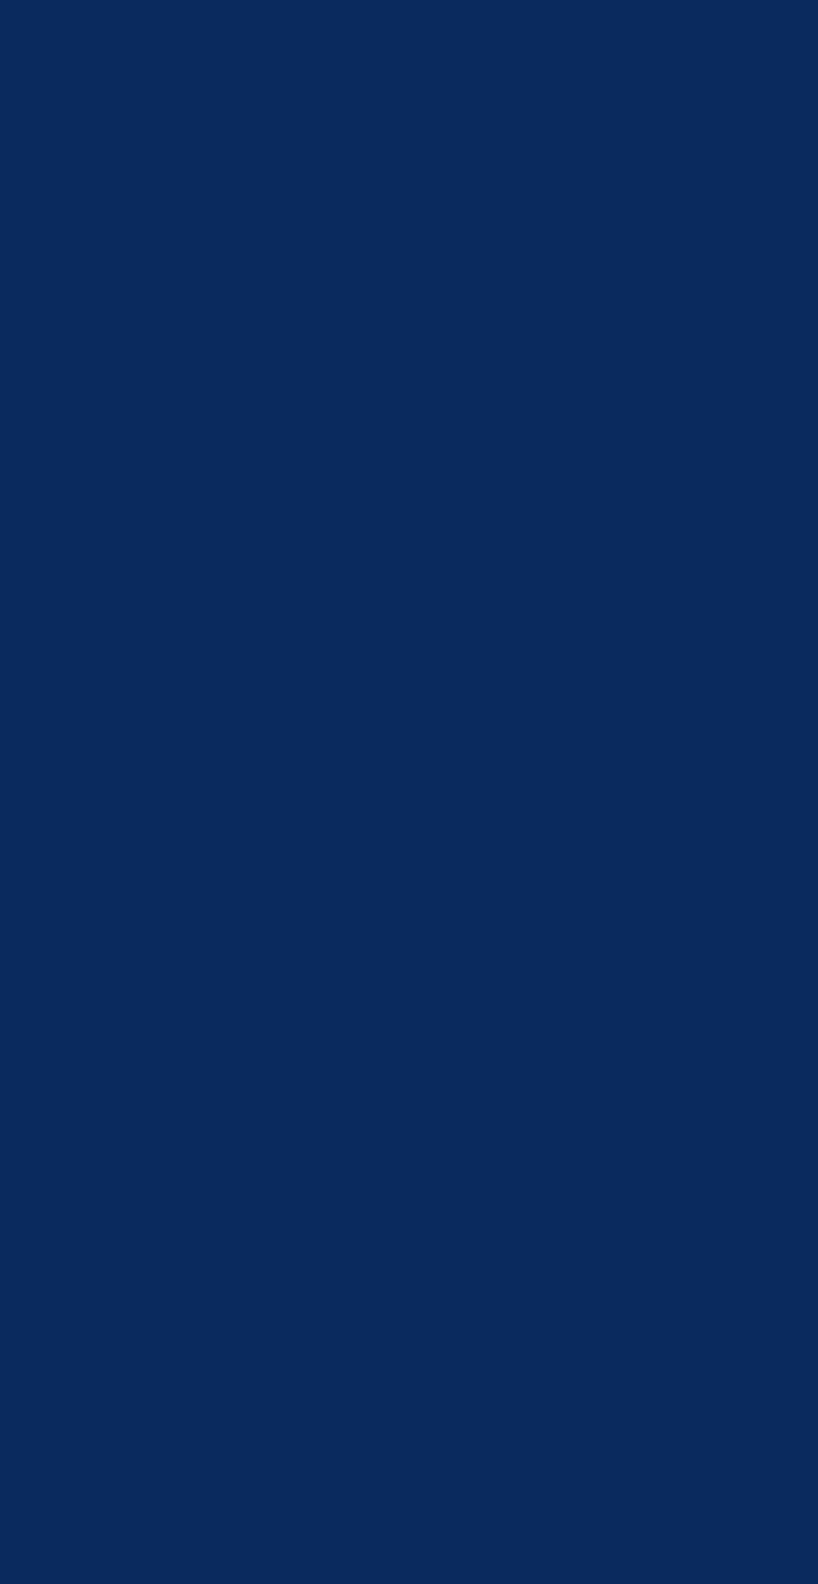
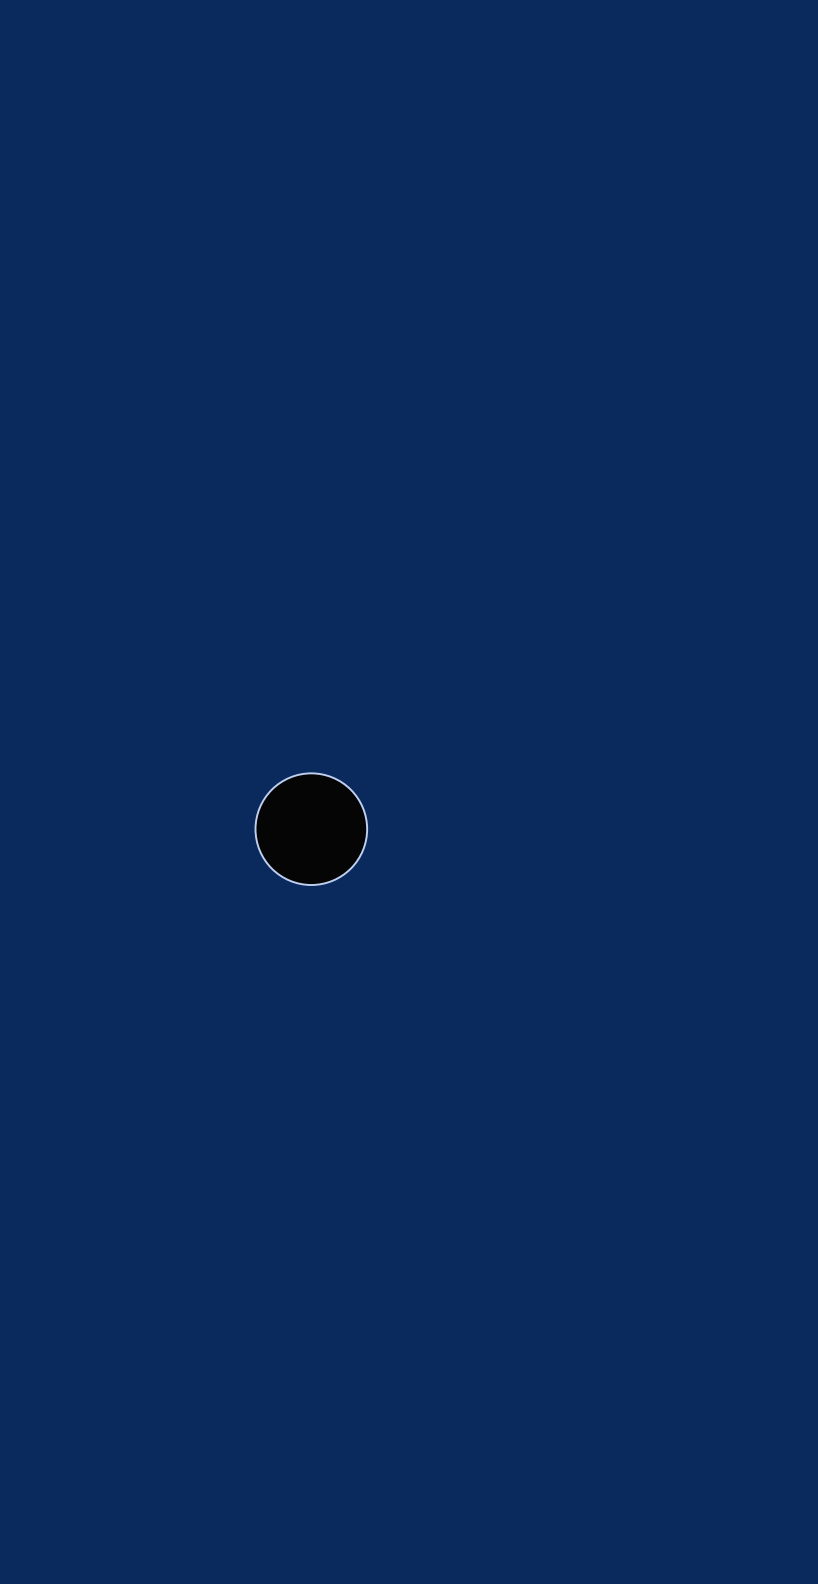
part: none -> (311, 829)

